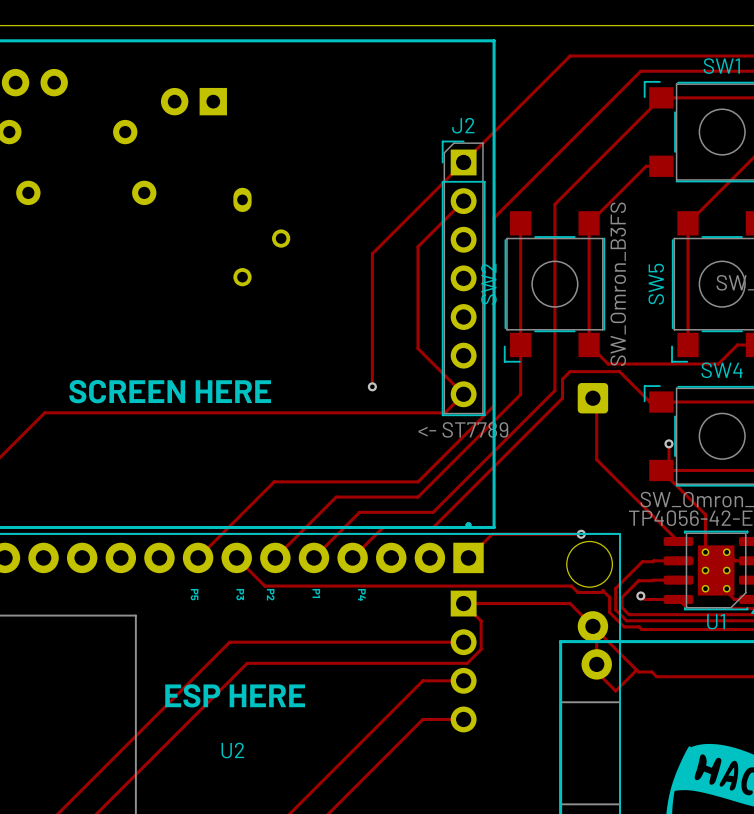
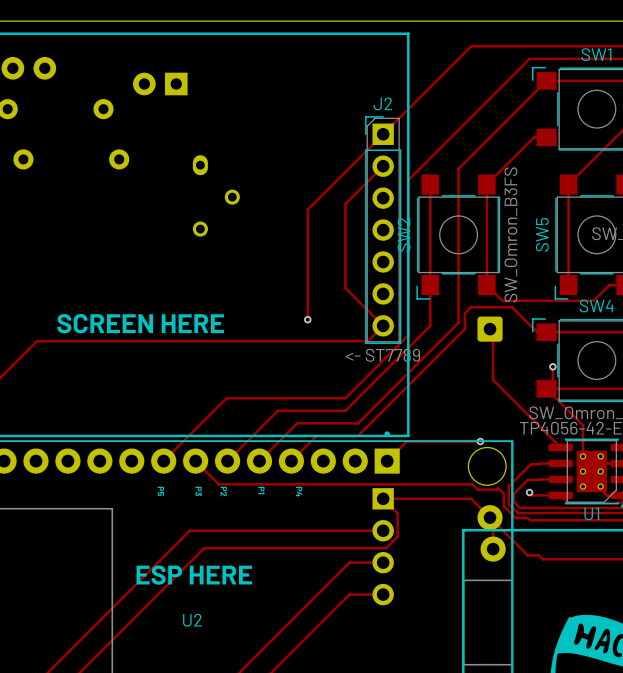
track: (636, 670) (615, 691) (596, 672) -> none

